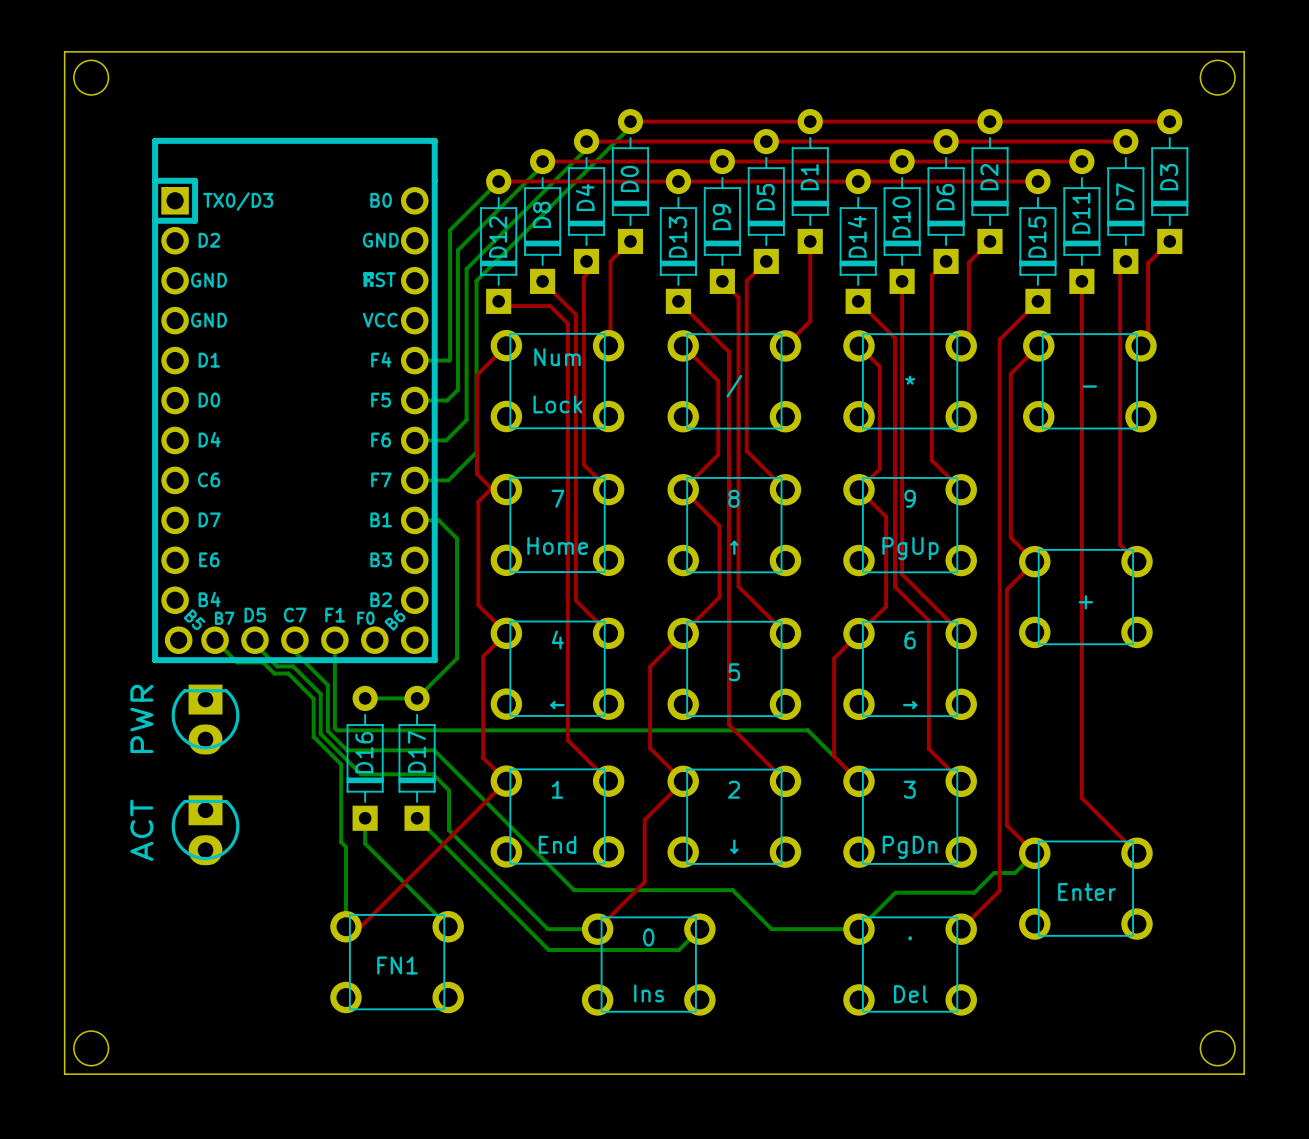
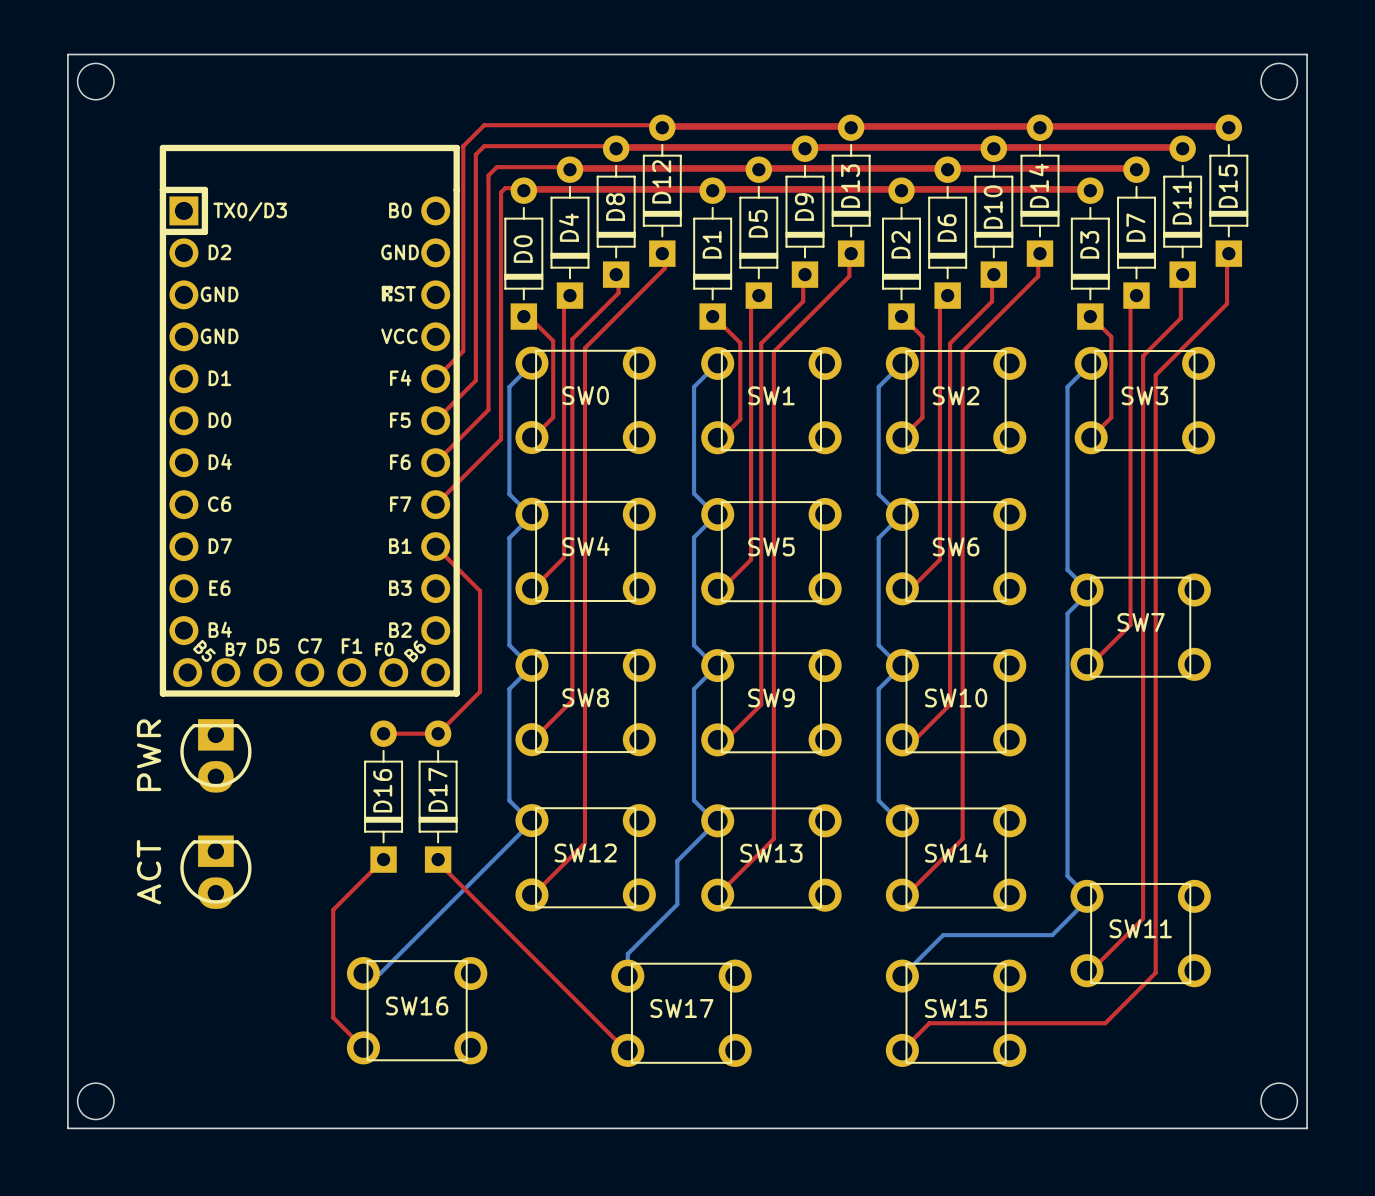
top track: none -> (1227, 125) (484, 125) (463, 146) (463, 351) (435, 378)
bottom track: (630, 121) (630, 126) (476, 280) (476, 452) (448, 480) (414, 480) -> none
top track: none -> (1180, 146) (484, 146) (475, 154) (475, 380) (435, 420)
bottom track: (586, 141) (586, 149) (466, 268) (466, 420) (446, 440) (414, 440) -> none
top track: none -> (1134, 167) (496, 167) (488, 175) (488, 409) (435, 462)
bottom track: (542, 161) (542, 165) (457, 250) (457, 389) (447, 400) (414, 400) -> none
D1 name: D1 (809, 177) -> D13 (850, 186)
D2 name: D2 (989, 177) -> D14 (1038, 185)
D3 name: D3 (1169, 177) -> D15 (1228, 186)
D0 name: D0 (629, 178) -> D12 (661, 181)
bottom track: (498, 181) (450, 230) (450, 359) (414, 360) -> none
D7 name: D7 (1125, 196) -> D11 (1182, 202)
D4 name: D4 (585, 197) -> D8 (615, 207)
D5 name: D5 (765, 197) -> D9 (804, 207)
D6 name: D6 (945, 197) -> D10 (993, 207)
D11 name: D11 (1081, 213) -> D7 (1135, 227)
D8 name: D8 (541, 214) -> D4 (568, 227)
D9 name: D9 (721, 217) -> D5 (758, 223)
D10 name: D10 (901, 217) -> D6 (947, 228)
D14 name: D14 (857, 236) -> D2 (900, 244)
D12 name: D12 (498, 237) -> D0 (523, 249)
D13 name: D13 (677, 237) -> D1 (712, 244)
D15 name: D15 (1037, 237) -> D3 (1089, 244)
top track: none -> (664, 251) (664, 268) (584, 348) (584, 843) (531, 896)
top track: none -> (849, 251) (849, 276) (773, 351) (773, 838) (715, 896)
top track: none -> (1038, 251) (1038, 276) (962, 351) (962, 838) (904, 896)
top track: none -> (1227, 251) (1227, 303) (1155, 375) (1155, 972) (1105, 1023) (929, 1023) (900, 1052)
top track: (630, 241) (610, 261) (610, 343) (608, 345) -> none
top track: (810, 241) (810, 321) (785, 345) -> none
top track: (990, 241) (968, 262) (968, 338) (961, 345) -> none
top track: (1169, 241) (1148, 263) (1148, 338) (1140, 345) -> none
top track: none -> (618, 272) (618, 293) (572, 339) (572, 700) (531, 741)
top track: none -> (803, 272) (803, 301) (761, 343) (761, 704) (724, 741)
top track: none -> (992, 272) (992, 301) (950, 343) (950, 704) (913, 741)
top track: none -> (1180, 272) (1180, 318) (1143, 356) (1143, 918) (1089, 972)
top track: (766, 261) (746, 281) (746, 450) (785, 489) -> none
top track: (946, 261) (931, 275) (931, 460) (961, 489) -> none
top track: (1125, 261) (1120, 267) (1120, 544) (1136, 561) -> none
top track: (588, 272) (583, 277) (583, 464) (608, 489) -> none
top track: none -> (572, 293) (564, 301) (564, 557) (531, 590)
top track: none -> (1134, 293) (1130, 297) (1130, 624) (1089, 666)
top track: (542, 281) (575, 314) (575, 600) (608, 633) -> none
top track: (722, 281) (738, 297) (738, 586) (785, 633) -> none
top track: (902, 281) (902, 574) (961, 633) -> none
top track: (1081, 281) (1081, 798) (1136, 853) -> none
top track: none -> (751, 303) (751, 559) (718, 592)
top track: none -> (939, 303) (939, 559) (907, 592)
top track: none -> (526, 314) (553, 340) (553, 417) (531, 439)
top track: none -> (899, 314) (922, 336) (922, 417) (900, 439)
top track: none -> (1088, 314) (1111, 336) (1111, 417) (1089, 439)
top track: none -> (713, 315) (740, 342) (740, 419) (718, 441)
top track: (498, 301) (503, 306) (550, 306) (567, 323) (567, 740) (608, 781) -> none
top track: (678, 301) (728, 351) (728, 724) (785, 781) -> none
top track: (858, 301) (895, 338) (895, 586) (928, 620) (928, 748) (961, 781) -> none
top track: (1037, 301) (999, 339) (999, 890) (961, 929) -> none
top track: (506, 345) (476, 375) -> (1088, 188) (505, 188) (501, 192) (501, 394)
top track: (859, 345) (879, 366) (879, 468) (859, 489) (886, 516) (886, 606) (834, 658) (834, 756) (859, 781) -> none
top track: (1038, 345) (1010, 373) (1010, 537) (1034, 561) (1006, 589) (1006, 825) (1034, 853) -> none
top track: (683, 346) (718, 380) (718, 454) (683, 489) (719, 526) (719, 597) (650, 666) (650, 748) (683, 781) (644, 819) (644, 882) (597, 929) -> none
bottom track: none -> (715, 365) (694, 386) (694, 493) (715, 515) (694, 537) (694, 645) (715, 667) (694, 689) (694, 800) (715, 822) (677, 861) (677, 904) (627, 953) (627, 977)
bottom track: none -> (900, 365) (878, 386) (878, 494) (900, 516) (878, 538) (878, 645) (900, 667) (878, 689) (878, 800) (900, 822)
bottom track: none -> (1089, 365) (1067, 386) (1067, 569) (1089, 591) (1067, 613) (1067, 876) (1089, 898) (1052, 935) (943, 935) (900, 977)
SW0 text: Num (557, 357) -> none
SW0 name: none -> SW0 (585, 395)
SW1 name: none -> SW1 (771, 395)
SW2 name: none -> SW2 (956, 395)
SW3 name: none -> SW3 (1144, 395)
SW2 text: * (910, 380) -> none
SW1 text: / (734, 386) -> none
SW3 text: - (1089, 386) -> none
SW0 text: Lock (557, 404) -> none
top track: (476, 418) (476, 474) (492, 489) -> (501, 439) (435, 504)
top track: (506, 489) (490, 489) (478, 501) (478, 605) (506, 633) (483, 656) (483, 757) (506, 781) (360, 926) (345, 926) -> none
SW4 text: 7 (557, 498) -> none
SW5 text: 8 (733, 498) -> none
SW6 text: 9 (910, 498) -> none
bottom track: (414, 520) (438, 520) (457, 538) (457, 658) (417, 698) (365, 698) -> none
top track: none -> (435, 546) (480, 591) (480, 691) (438, 733) (383, 733)
SW4 name: none -> SW4 (586, 546)
SW5 name: none -> SW5 (771, 546)
SW6 name: none -> SW6 (956, 546)
SW4 text: Home (557, 545) -> none
SW5 text: ↑ (734, 547) -> none
SW6 text: PgUp (910, 548) -> none
SW7 name: none -> SW7 (1141, 622)
SW7 text: + (1085, 602) -> none
SW8 text: 4 (557, 639) -> none
bottom track: (215, 640) (237, 662) (263, 662) (274, 673) (288, 673) (313, 698) (313, 736) (341, 764) (341, 842) (345, 847) (345, 926) -> (531, 365) (509, 386) (509, 494) (531, 516) (509, 538) (509, 645) (531, 667) (509, 689) (509, 800) (531, 822) (380, 973) (363, 973)
bottom track: (254, 640) (254, 644) (277, 666) (293, 666) (320, 693) (320, 733) (361, 774) (433, 774) (449, 790) (449, 830) (547, 929) (597, 929) -> none
bottom track: (294, 640) (294, 652) (327, 685) (327, 731) (347, 750) (434, 750) (574, 890) (732, 890) (771, 929) (859, 929) (895, 892) (974, 892) (994, 872) (1015, 872) (1034, 853) -> none
bottom track: (334, 640) (334, 728) (337, 730) (808, 730) (859, 781) -> none
SW10 text: 6 (910, 640) -> none
SW8 name: none -> SW8 (585, 697)
SW9 name: none -> SW9 (771, 697)
SW10 name: none -> SW10 (956, 697)
SW9 text: 5 (734, 672) -> none
SW8 text: ← (557, 705) -> none
SW10 text: → (910, 705) -> none
SW12 text: 1 (557, 789) -> none
SW13 text: 2 (733, 789) -> none
SW14 text: 3 (909, 789) -> none
SW14 name: none -> SW14 (956, 852)
SW12 name: none -> SW12 (585, 853)
SW13 name: none -> SW13 (771, 853)
bottom track: (365, 818) (365, 843) (448, 926) -> none
top track: none -> (383, 859) (333, 909) (333, 1017) (363, 1047)
bottom track: (417, 818) (548, 950) (679, 950) (699, 929) -> none
top track: none -> (438, 859) (438, 862) (627, 1052)
SW12 text: End (557, 844) -> none
SW13 text: ↓ (734, 846) -> none
SW14 text: PgDn (910, 847) -> none
SW11 name: none -> SW11 (1140, 928)
SW11 text: Enter (1087, 892) -> none
SW17 text: 0 (648, 937) -> none
SW15 text: . (910, 938) -> none
SW16 name: none -> SW16 (417, 1005)
SW17 name: none -> SW17 (681, 1008)
SW15 name: none -> SW15 (956, 1008)
SW16 text: FN1 (397, 965) -> none
SW17 text: Ins (649, 993) -> none
SW15 text: Del (910, 994) -> none

